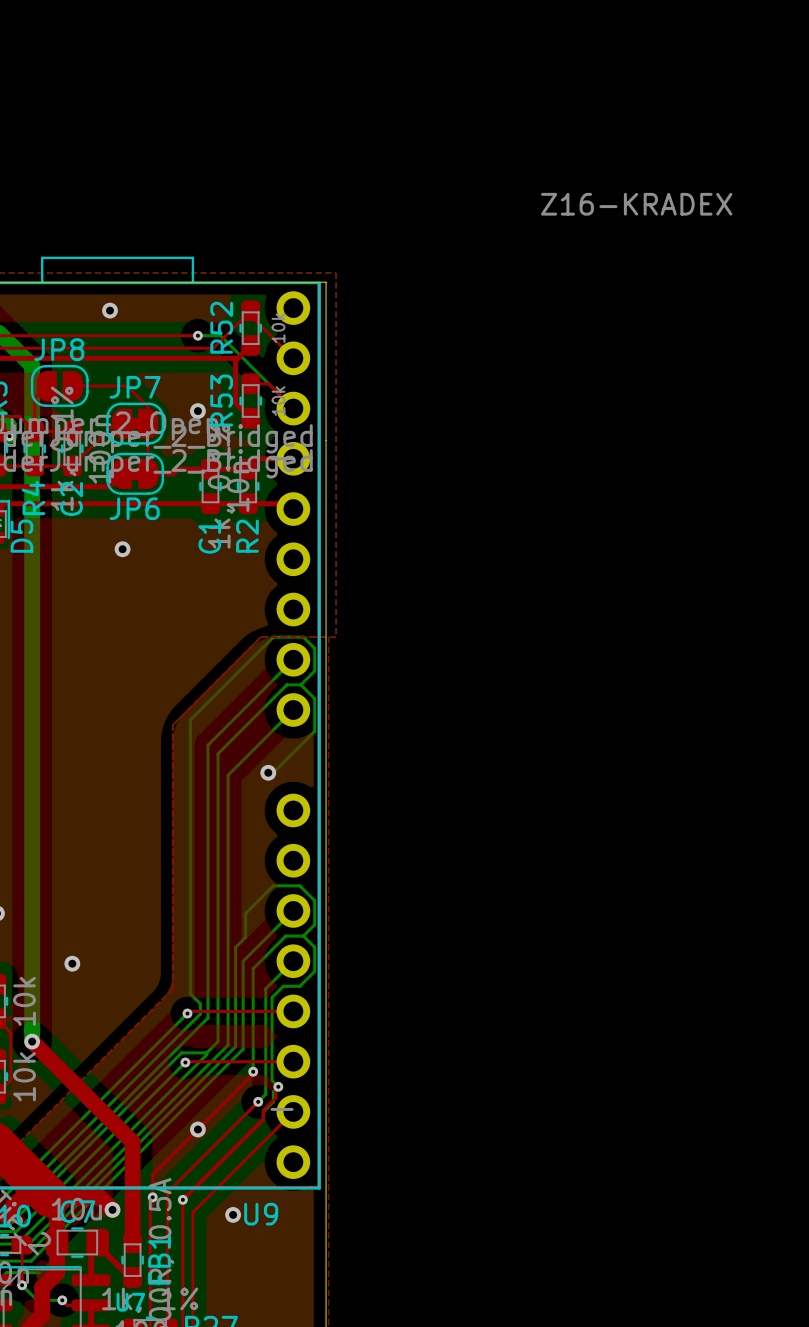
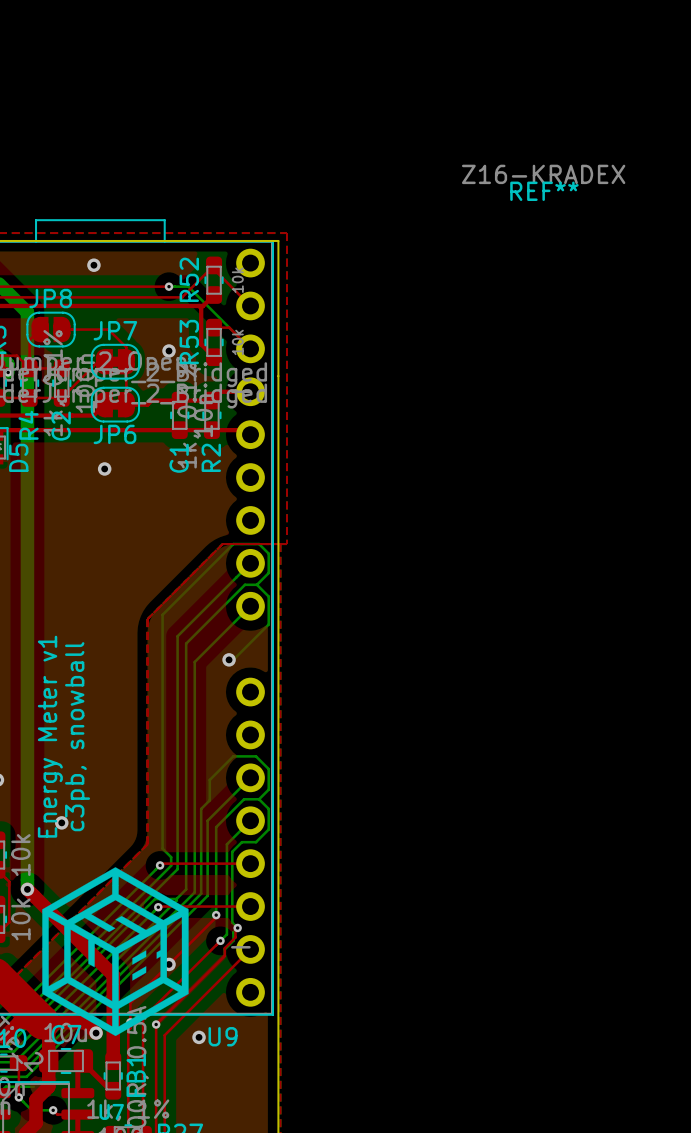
drawing: [541, 192, 733, 216] -> none
REF**: none -> Z16-KRADEX (543, 182)
text: none -> Energy Meter v1 (50, 736)
text: none -> c3pb, snowball (77, 736)
drawing: none -> [42, 867, 189, 1037]

